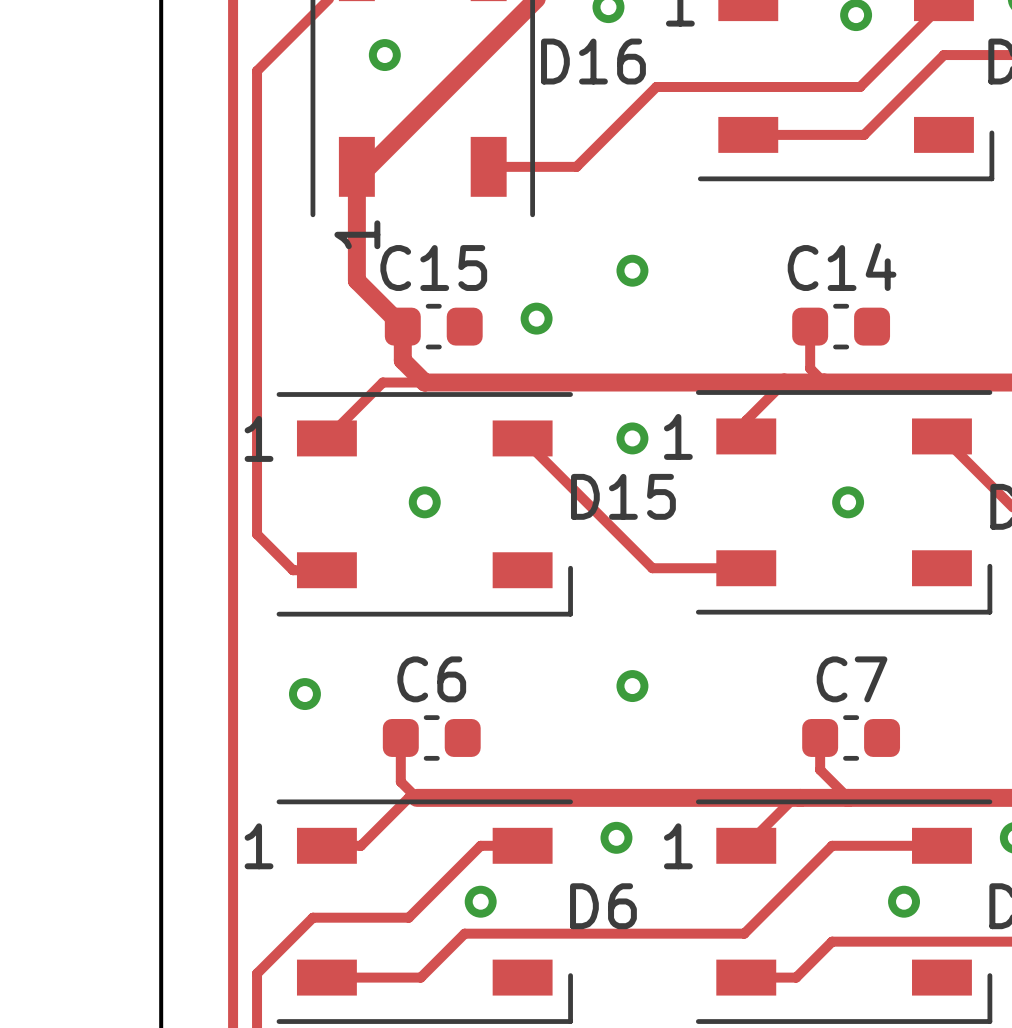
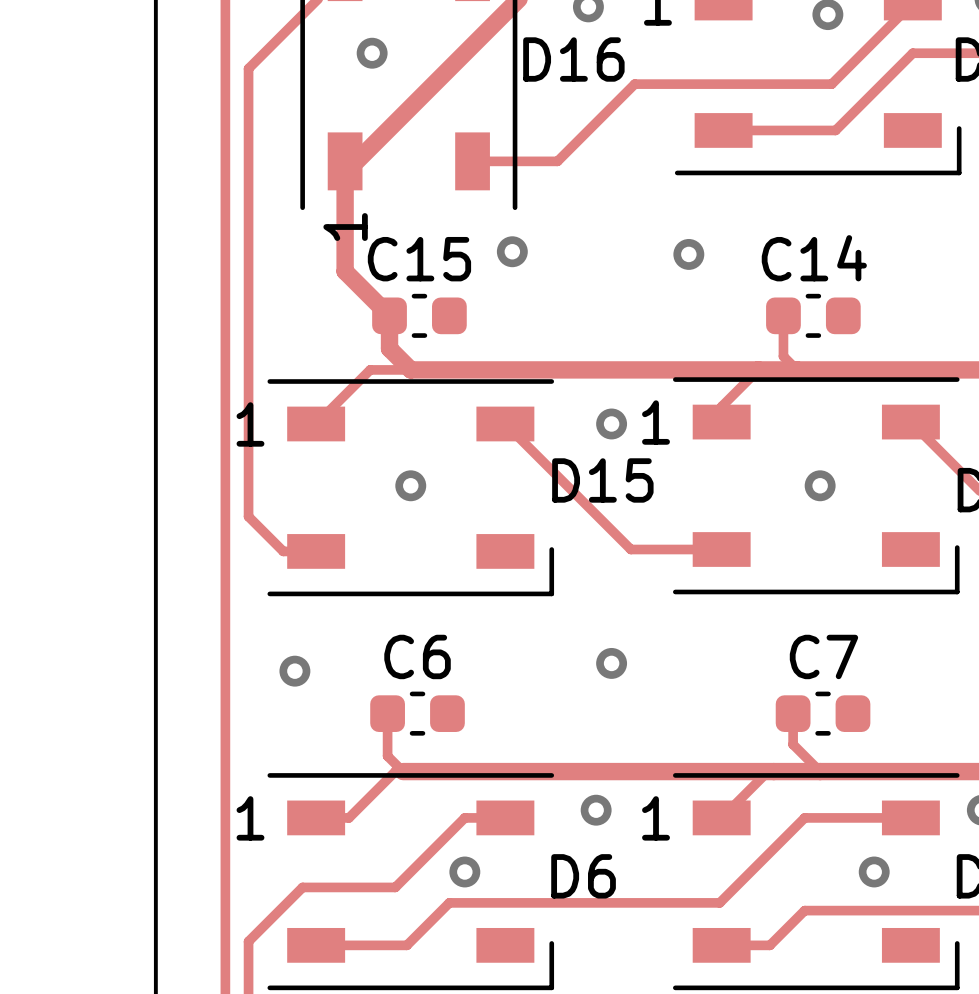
via: none -> (512, 251)
via: none -> (688, 254)
via: (632, 270) -> none
via: (536, 318) -> none

